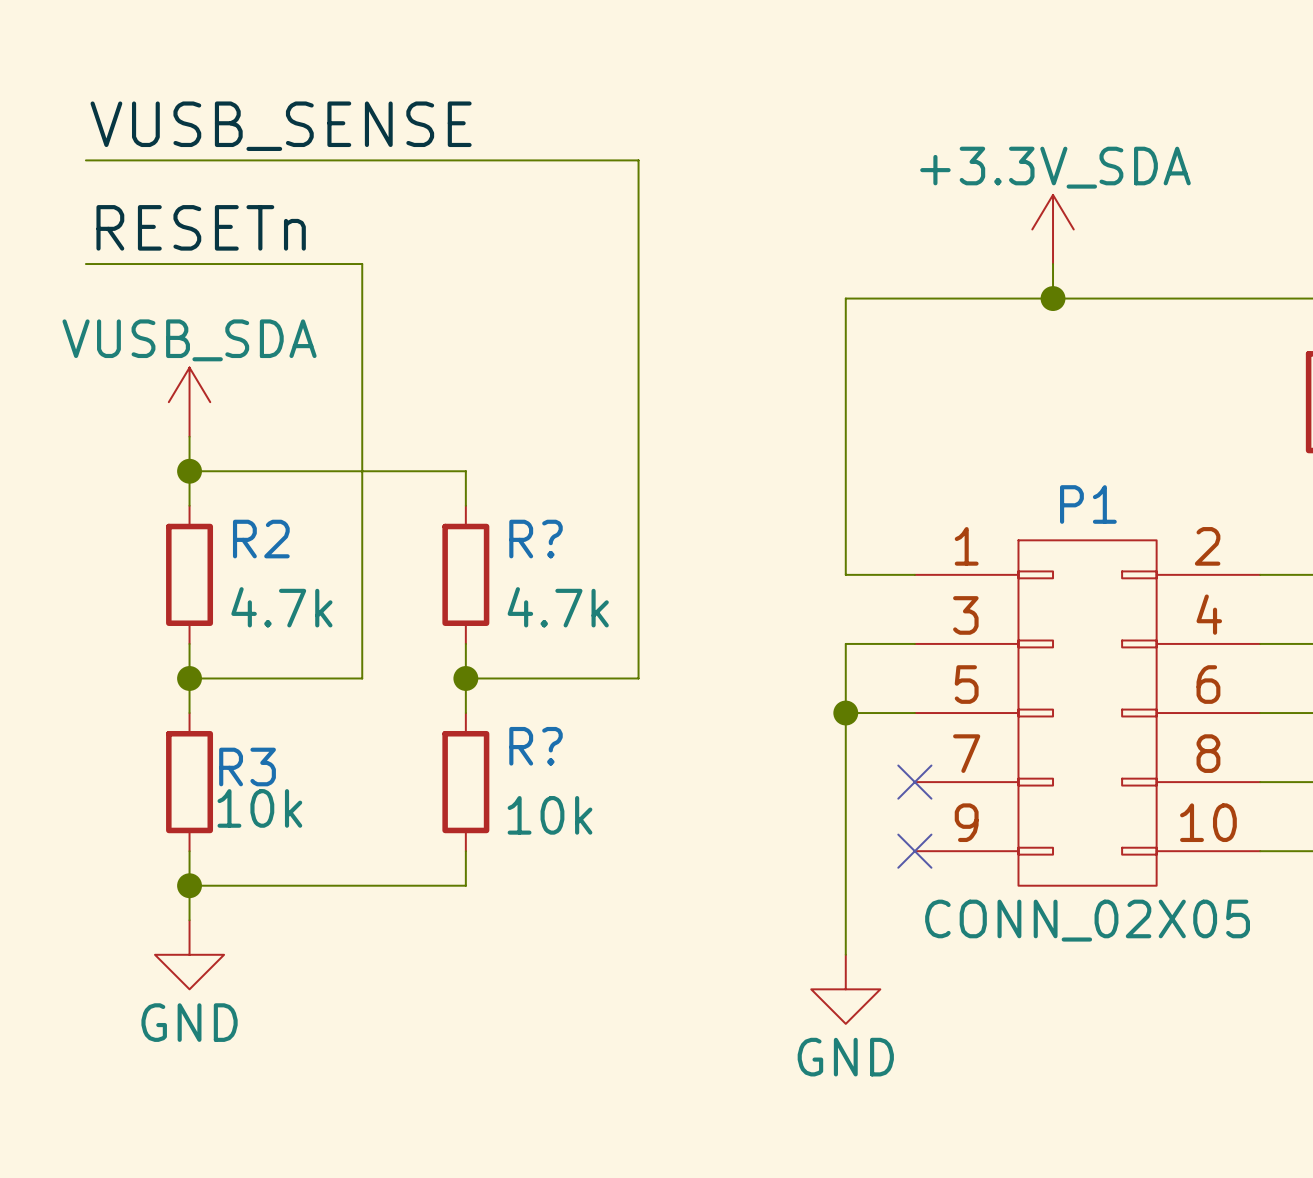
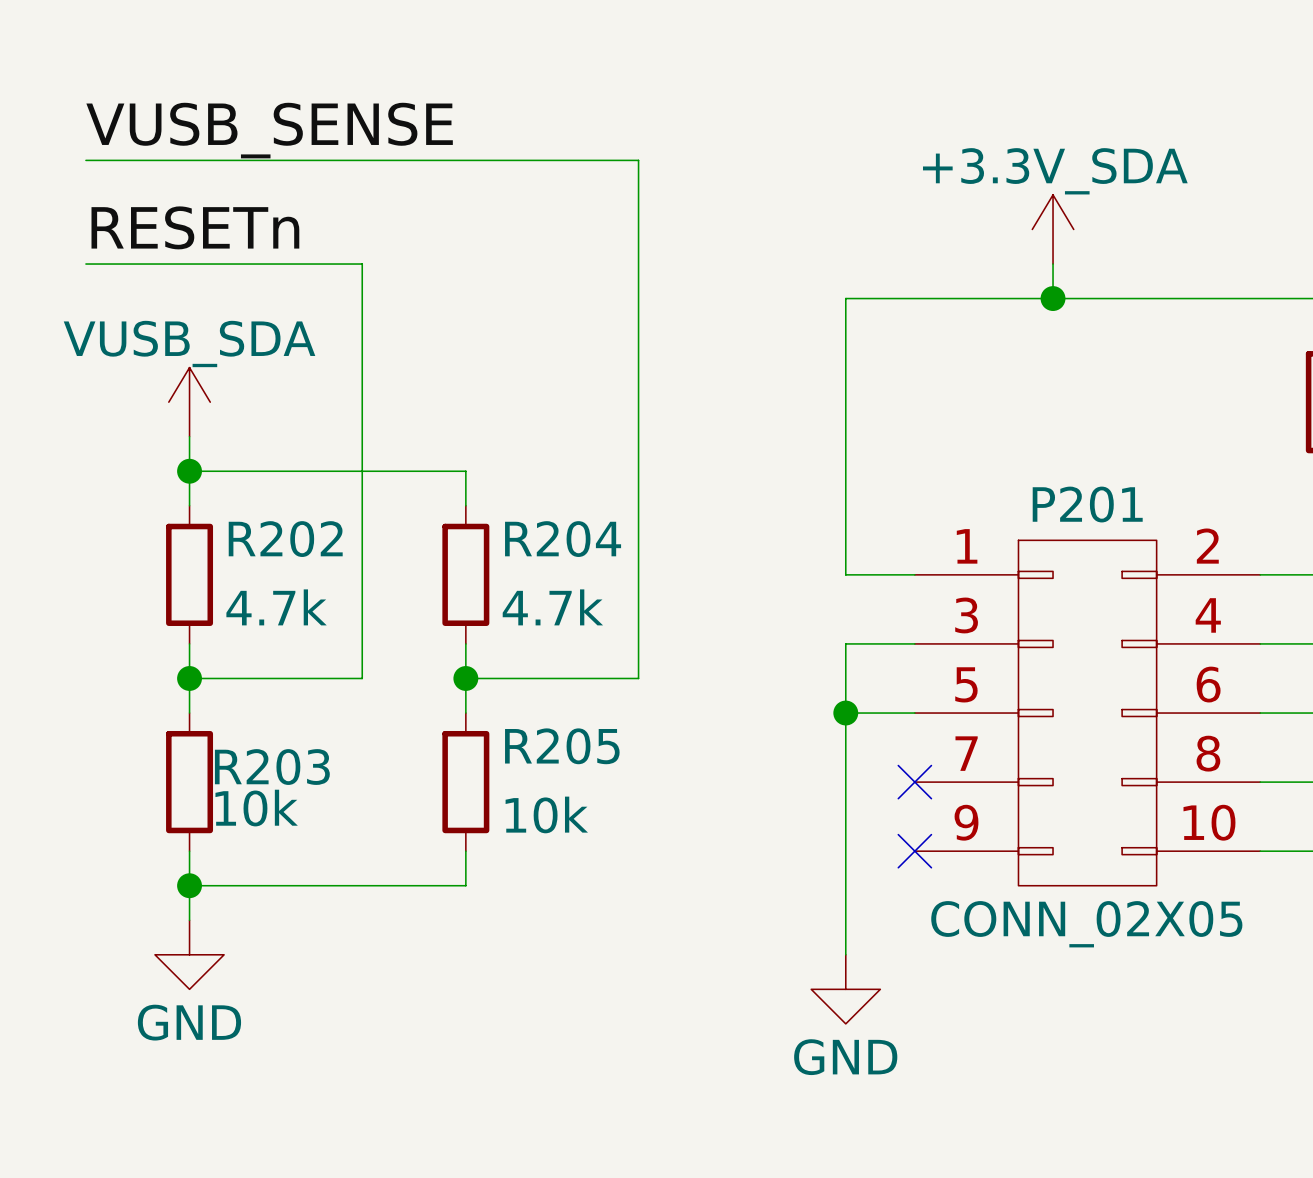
P1 name: P1 (1088, 504) -> P201 (1087, 504)
R2 name: R2 (261, 539) -> R202 (285, 539)
R? name: R? (536, 539) -> R204 (563, 539)
R? name: R? (536, 746) -> R205 (562, 746)
R3 name: R3 (247, 766) -> R203 (272, 767)

